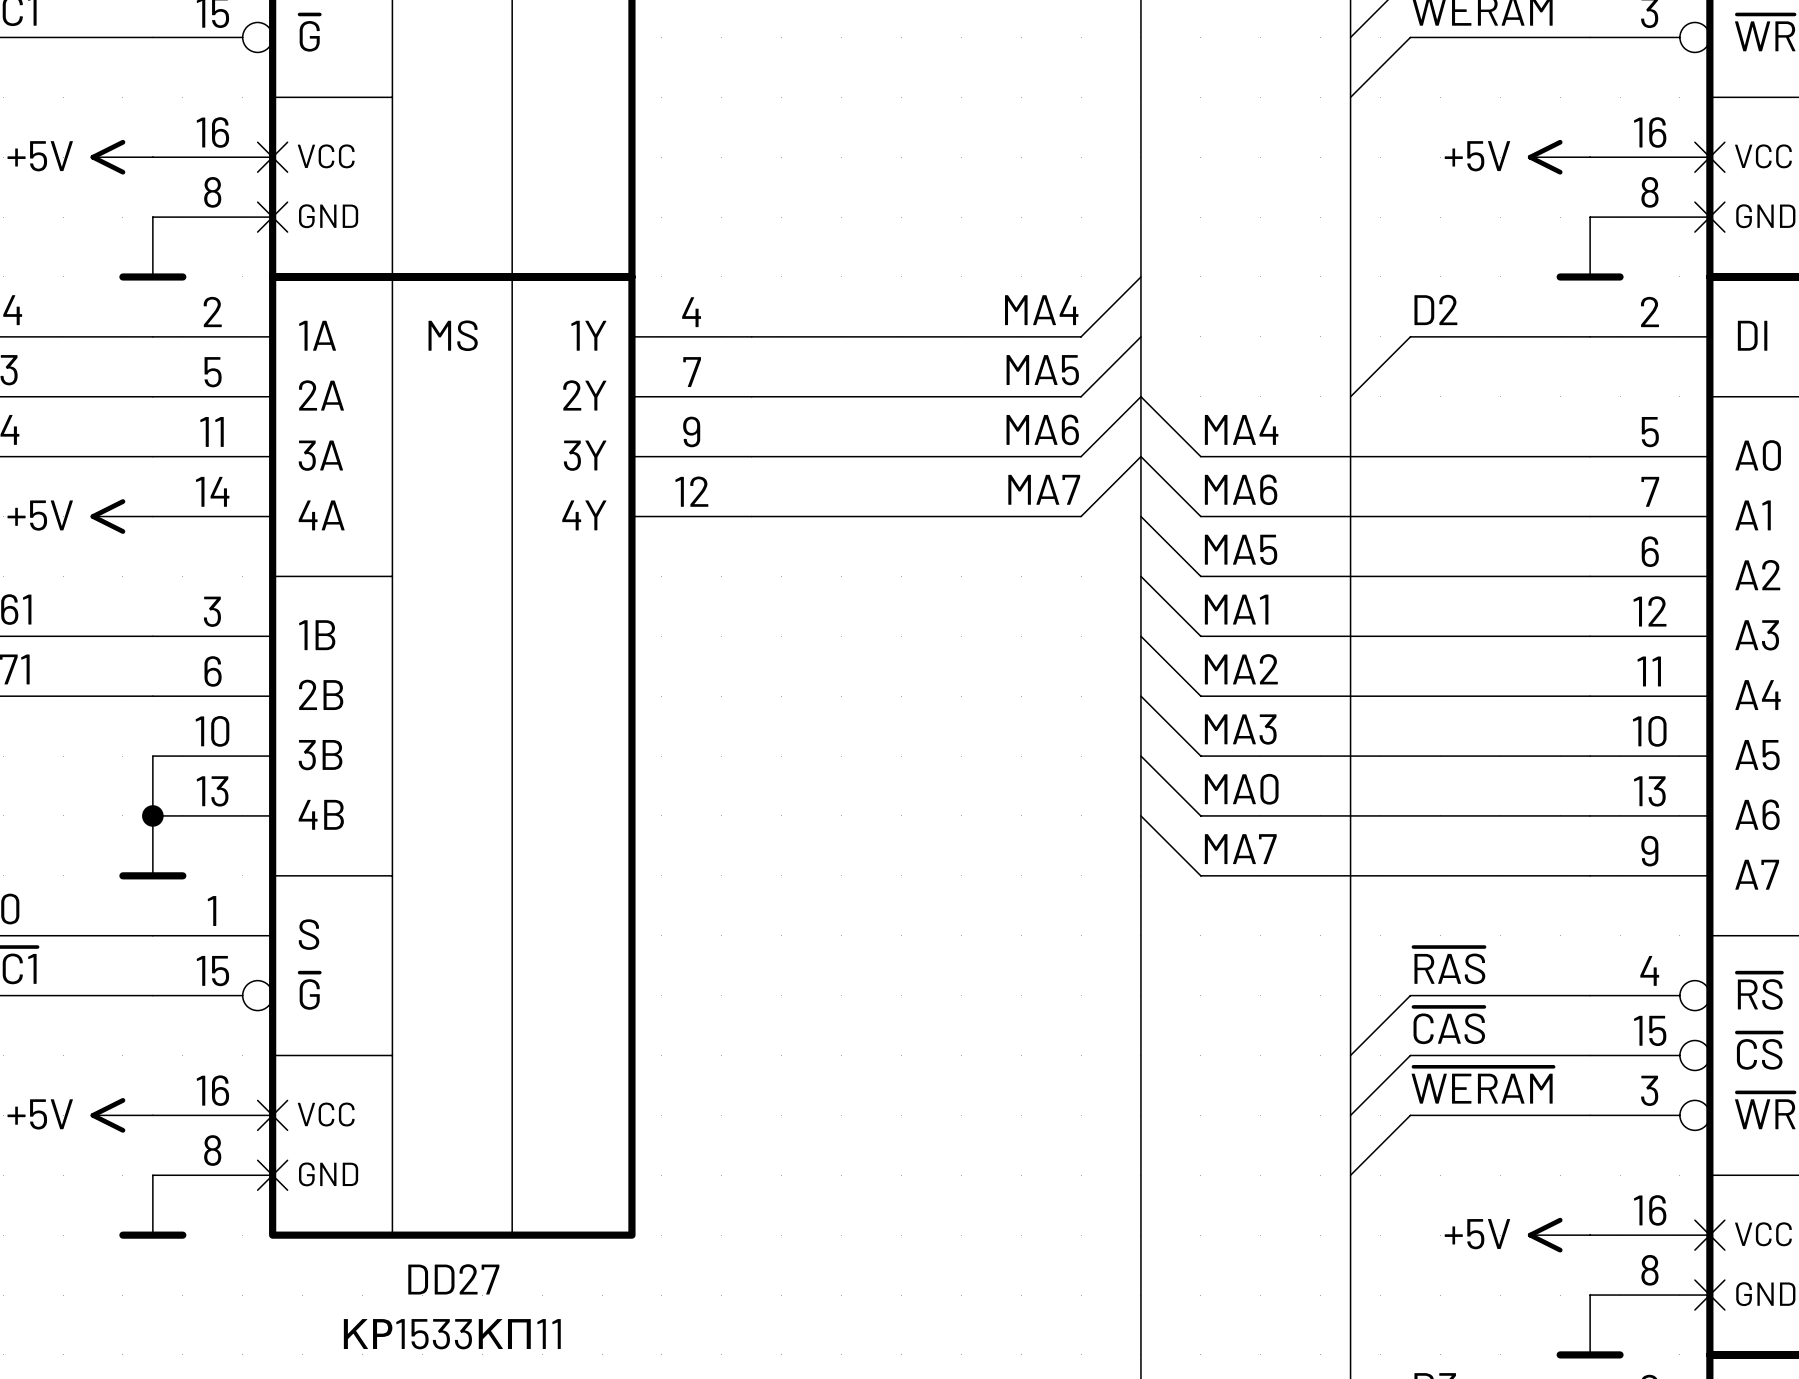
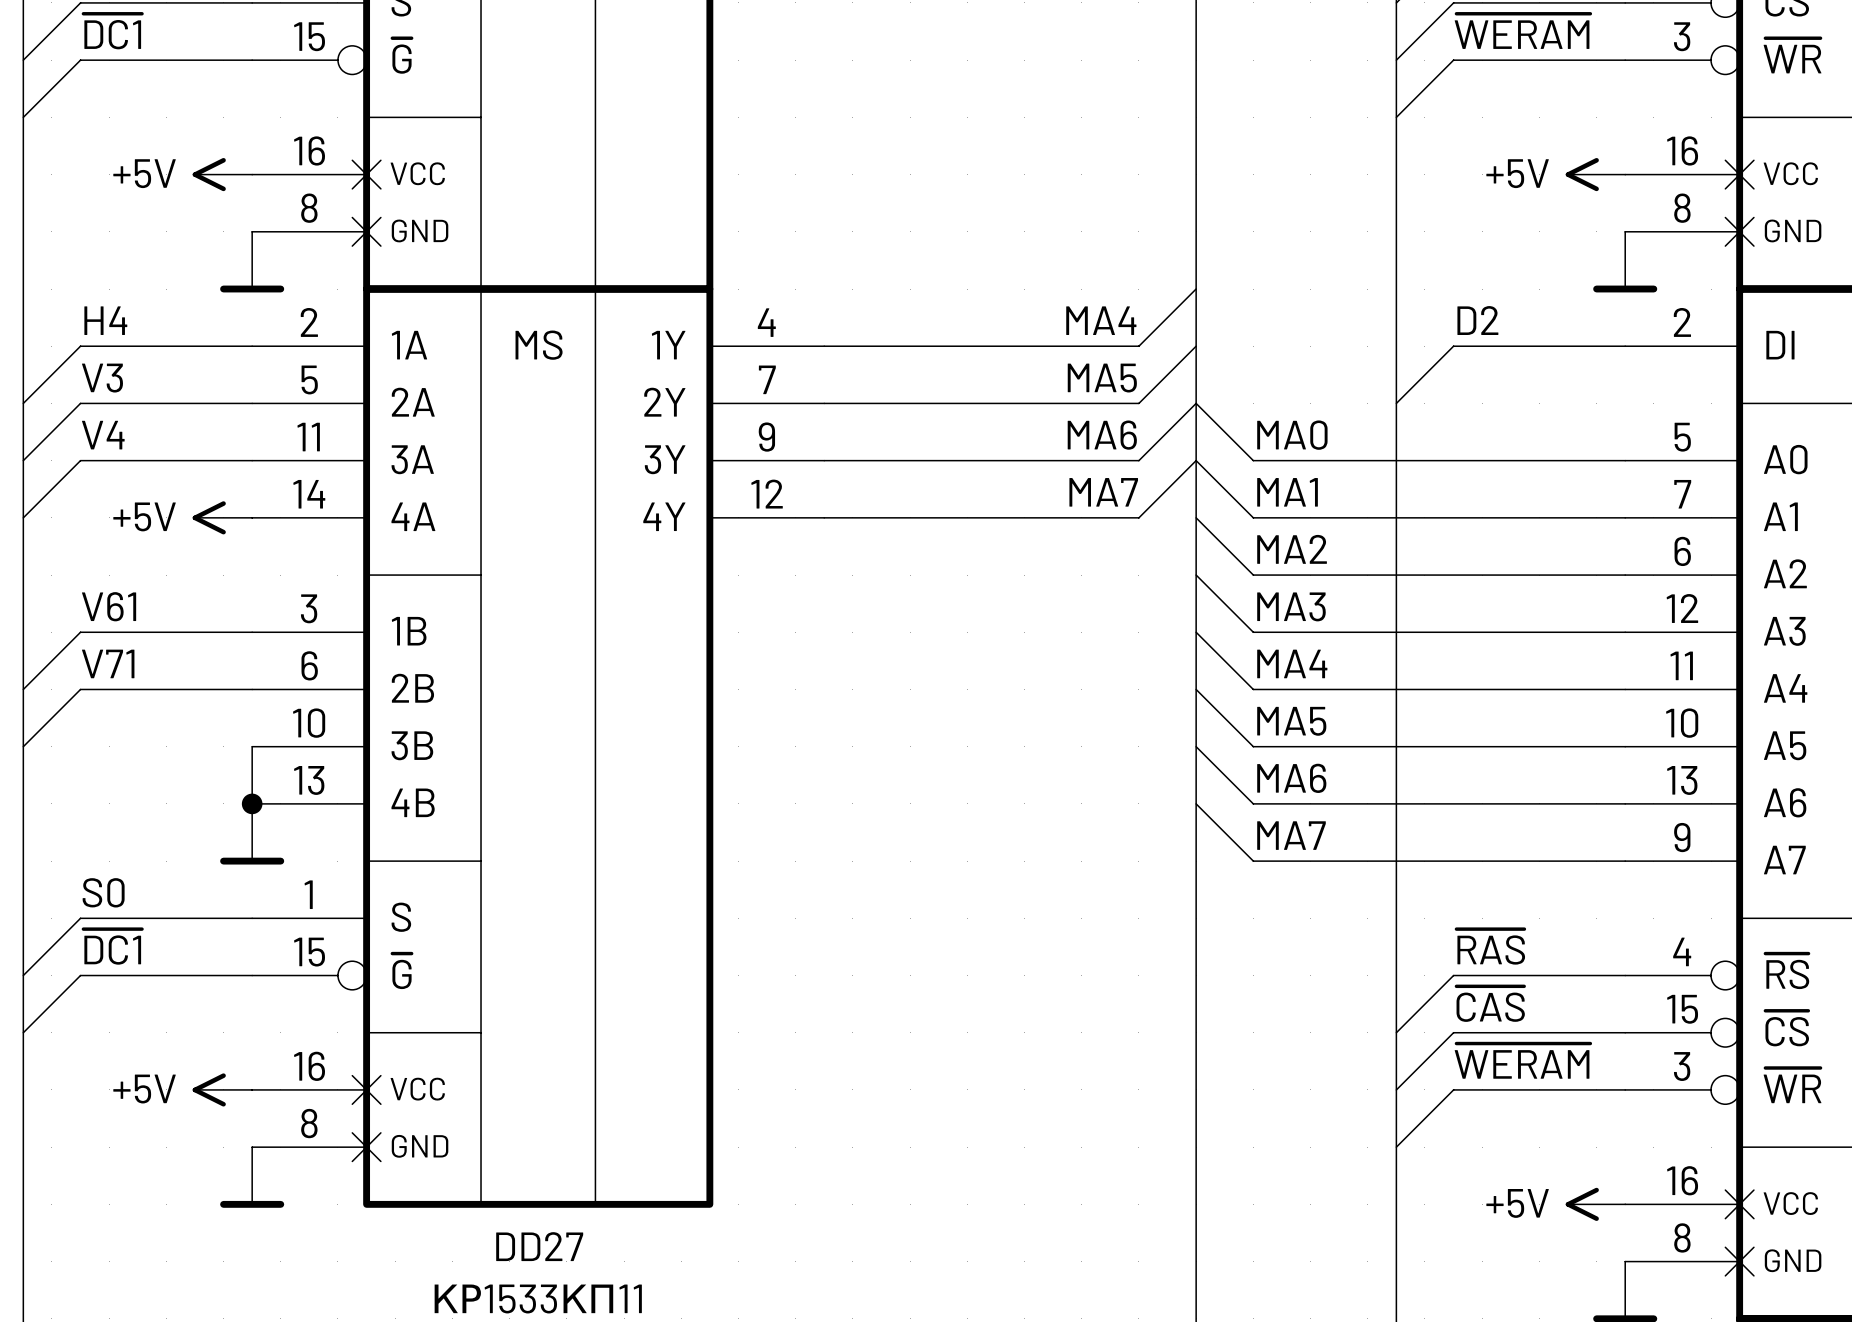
label: MA4 (1241, 429) -> MA0 (1292, 435)
label: MA6 (1241, 489) -> MA1 (1287, 492)
label: MA5 (1241, 549) -> MA2 (1292, 549)
label: MA1 (1236, 609) -> MA3 (1291, 606)
label: MA2 (1241, 669) -> MA4 (1292, 663)
label: MA3 (1240, 729) -> MA5 (1291, 721)
label: MA0 (1241, 789) -> MA6 (1291, 778)

